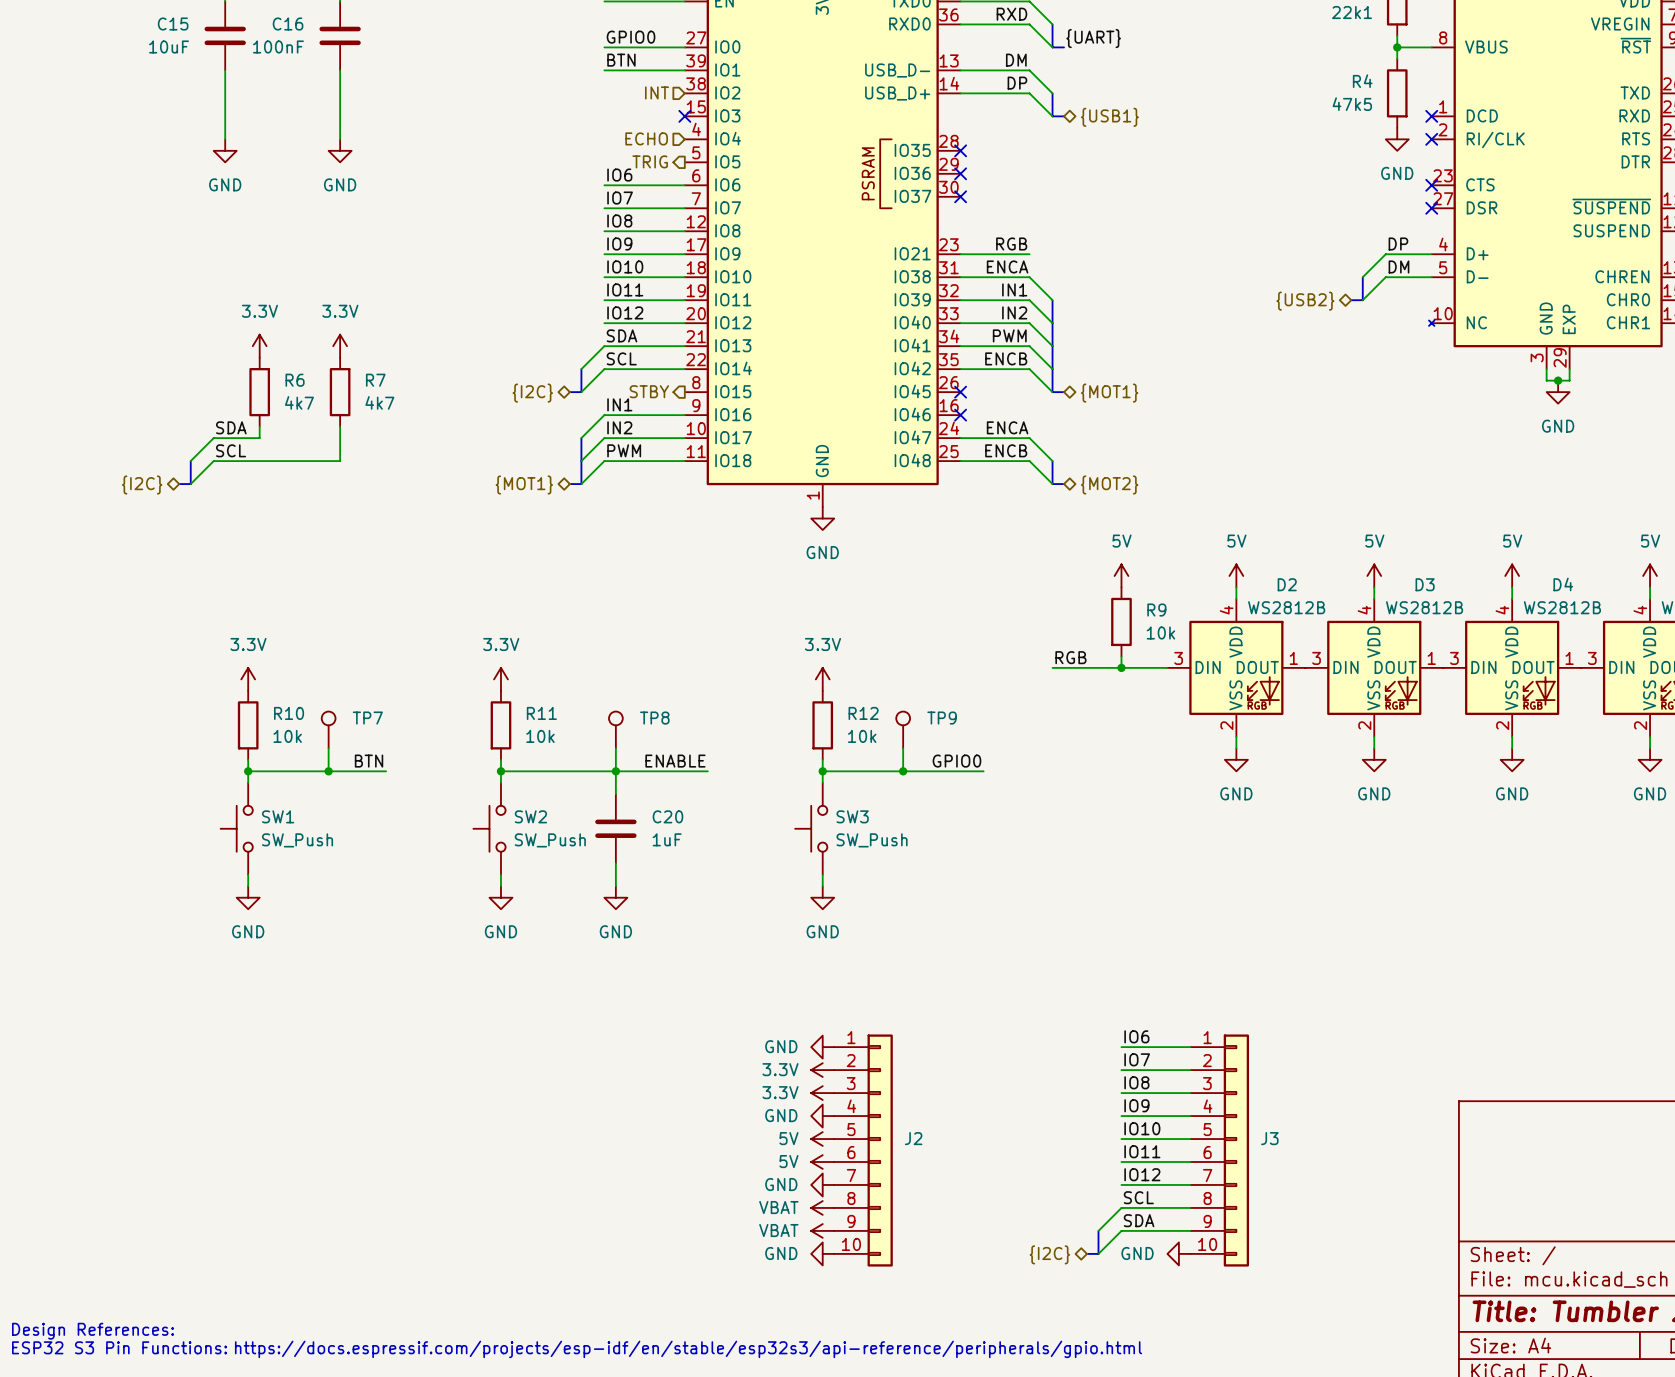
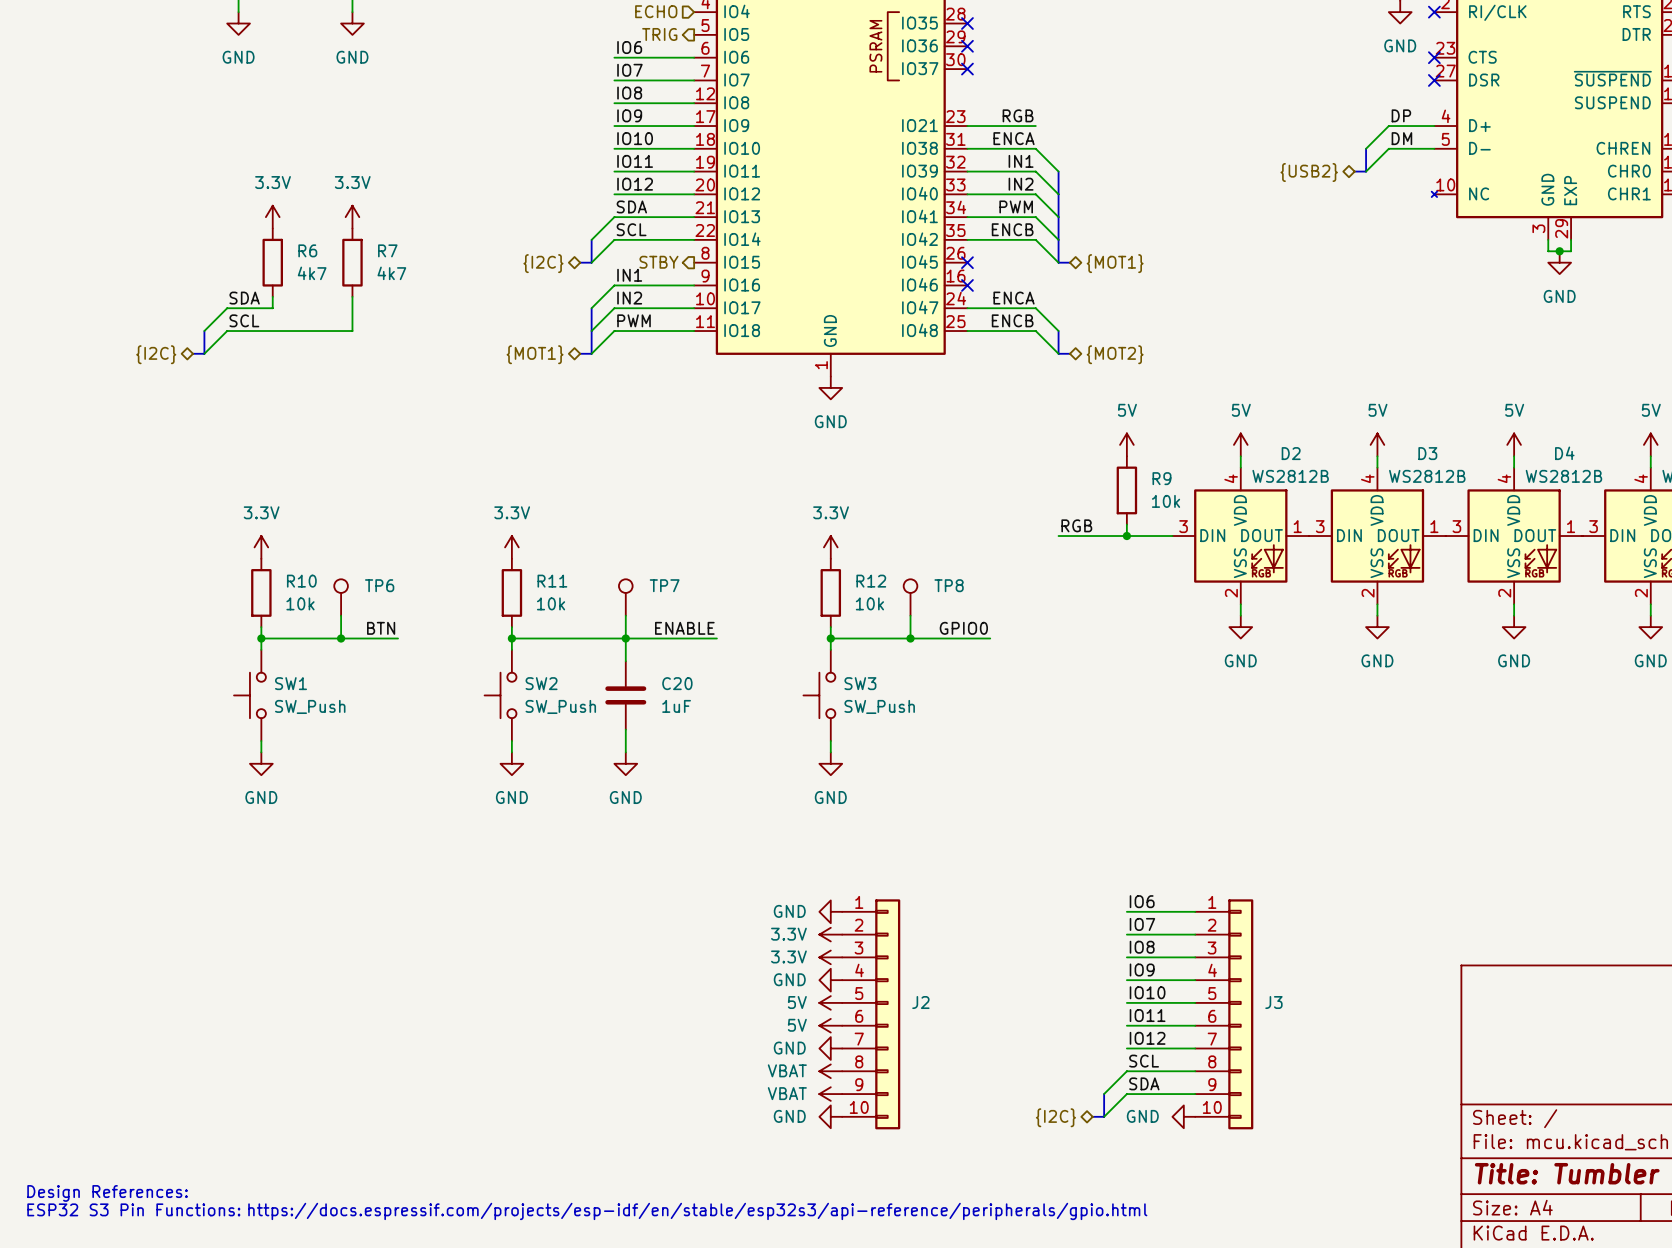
TP7 name: TP7 (367, 718) -> TP6 (379, 585)
TP8 name: TP8 (654, 718) -> TP7 (664, 585)
TP9 name: TP9 (942, 718) -> TP8 (949, 585)

